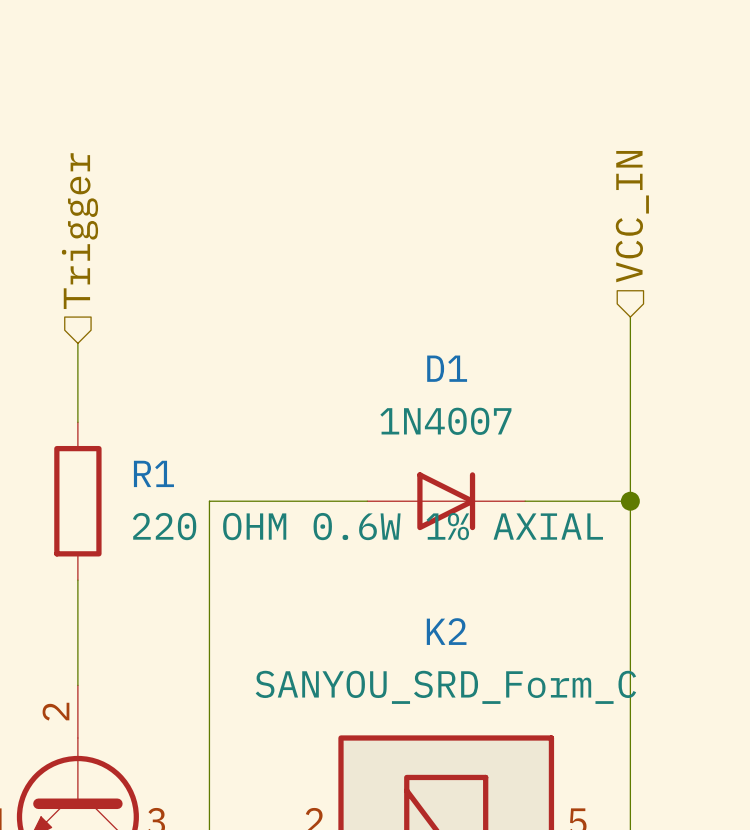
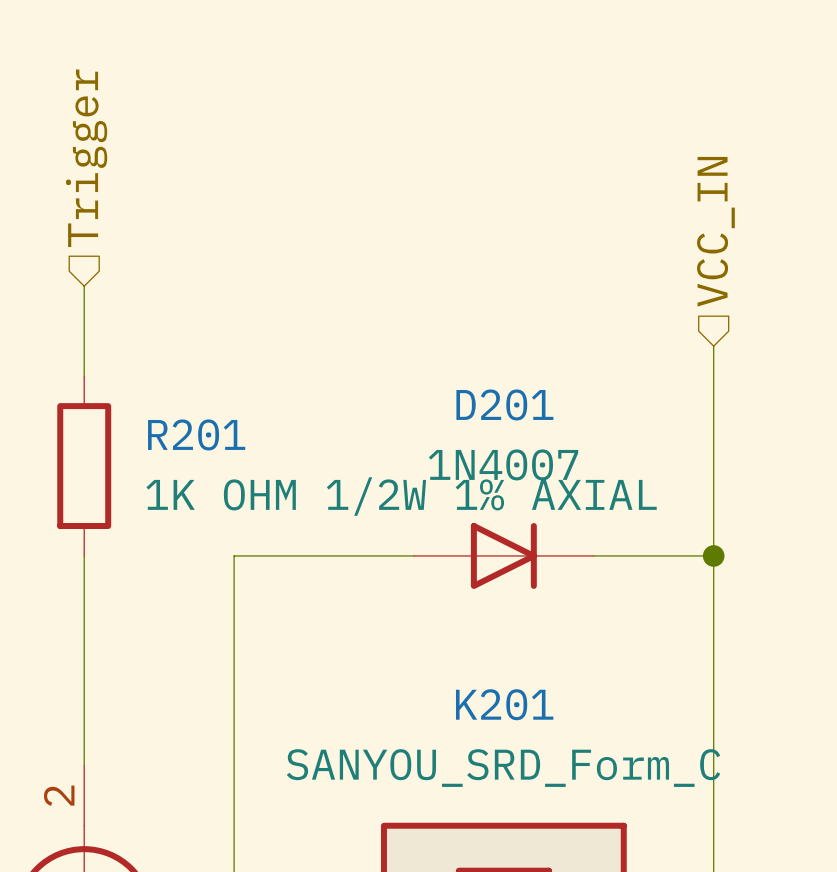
hierarchical label position: Trigger (79, 231) -> Trigger (86, 158)
wire: (77, 343) (77, 422) -> (84, 376) (84, 286)
D1 name: D1 (447, 368) -> D201 (504, 404)
R201: none -> 1K OHM 1/2W 1% AXIAL (84, 466)
wire: none -> (84, 555) (84, 645)
R1: 220 OHM 0.6W 1% AXIAL (77, 501) -> none
K2 name: K2 (446, 631) -> K201 (504, 704)

